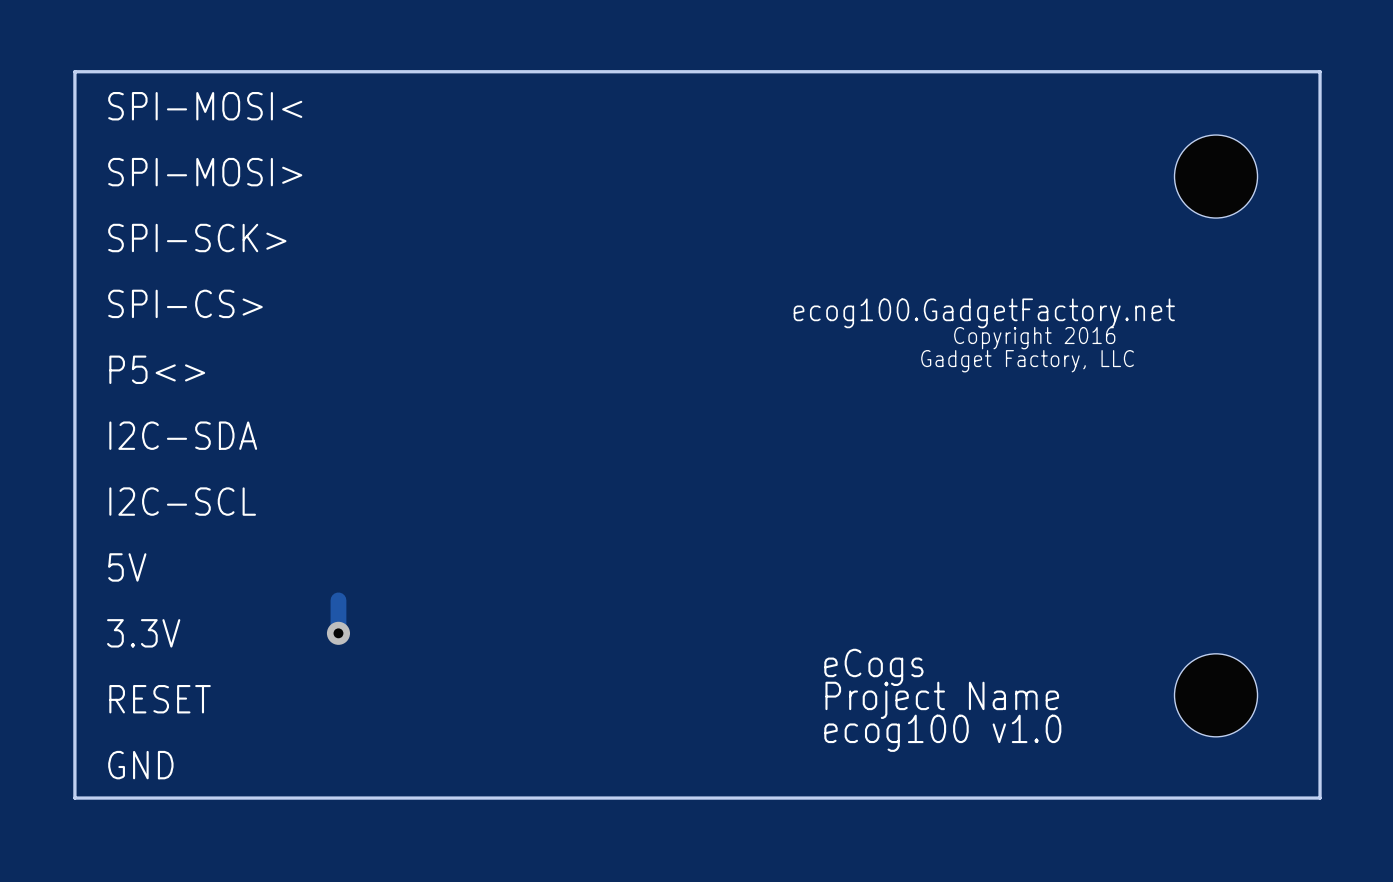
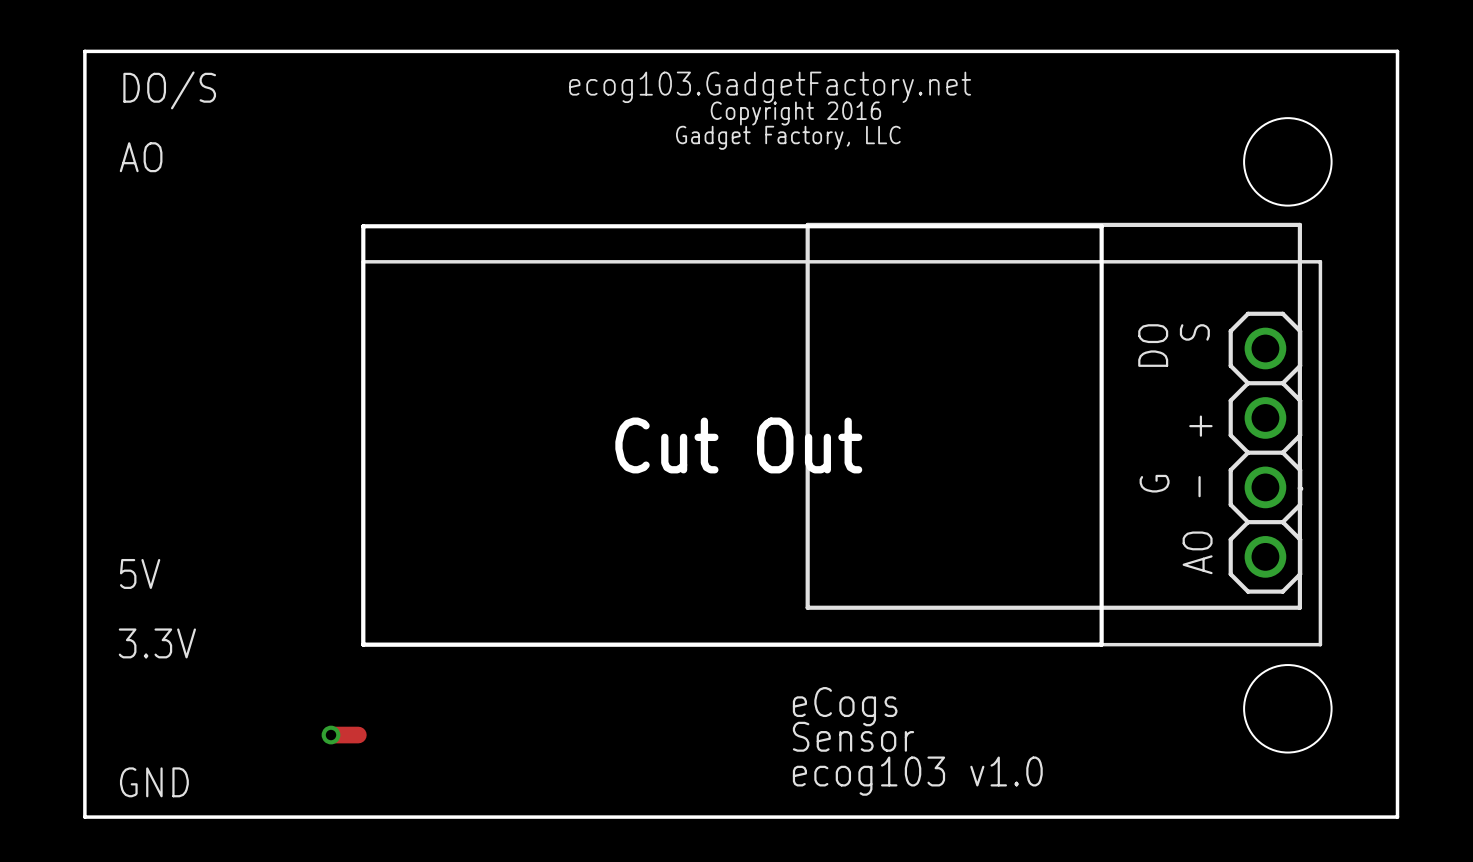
text: none -> ecog103.GadgetFactory.net (770, 87)
text: SPI-MOSI< (205, 106) -> DO/S (169, 90)
text: SPI-MOSI> (205, 172) -> AO (141, 157)
text: SPI-SCK> (197, 238) -> none
text: SPI-CS> (185, 303) -> none
text: ecog100.GadgetFactory.net (984, 313) -> none
text position: Copyright 2016 (1034, 338) -> Copyright 2016 (795, 113)
text position: Gadget Factory, LLC (1027, 361) -> Gadget Factory, LLC (788, 137)
text: P5<> (157, 369) -> none
text: I2C-SDA (183, 435) -> none
part: none -> (841, 434)
text: none -> Cut Out (738, 445)
text: I2C-SCL (182, 501) -> none
track: (338, 600) (338, 633) -> none
via: (338, 633) -> none
text position: eCogs (873, 667) -> eCogs (845, 706)
text: RESET (160, 699) -> none
text: Project Name (942, 700) -> none
track: none -> (331, 735) (358, 735)
via: none -> (331, 735)
text: none -> Sensor (853, 736)
text: ecog100 v1.0 (942, 733) -> ecog103 v1.0 (917, 776)

